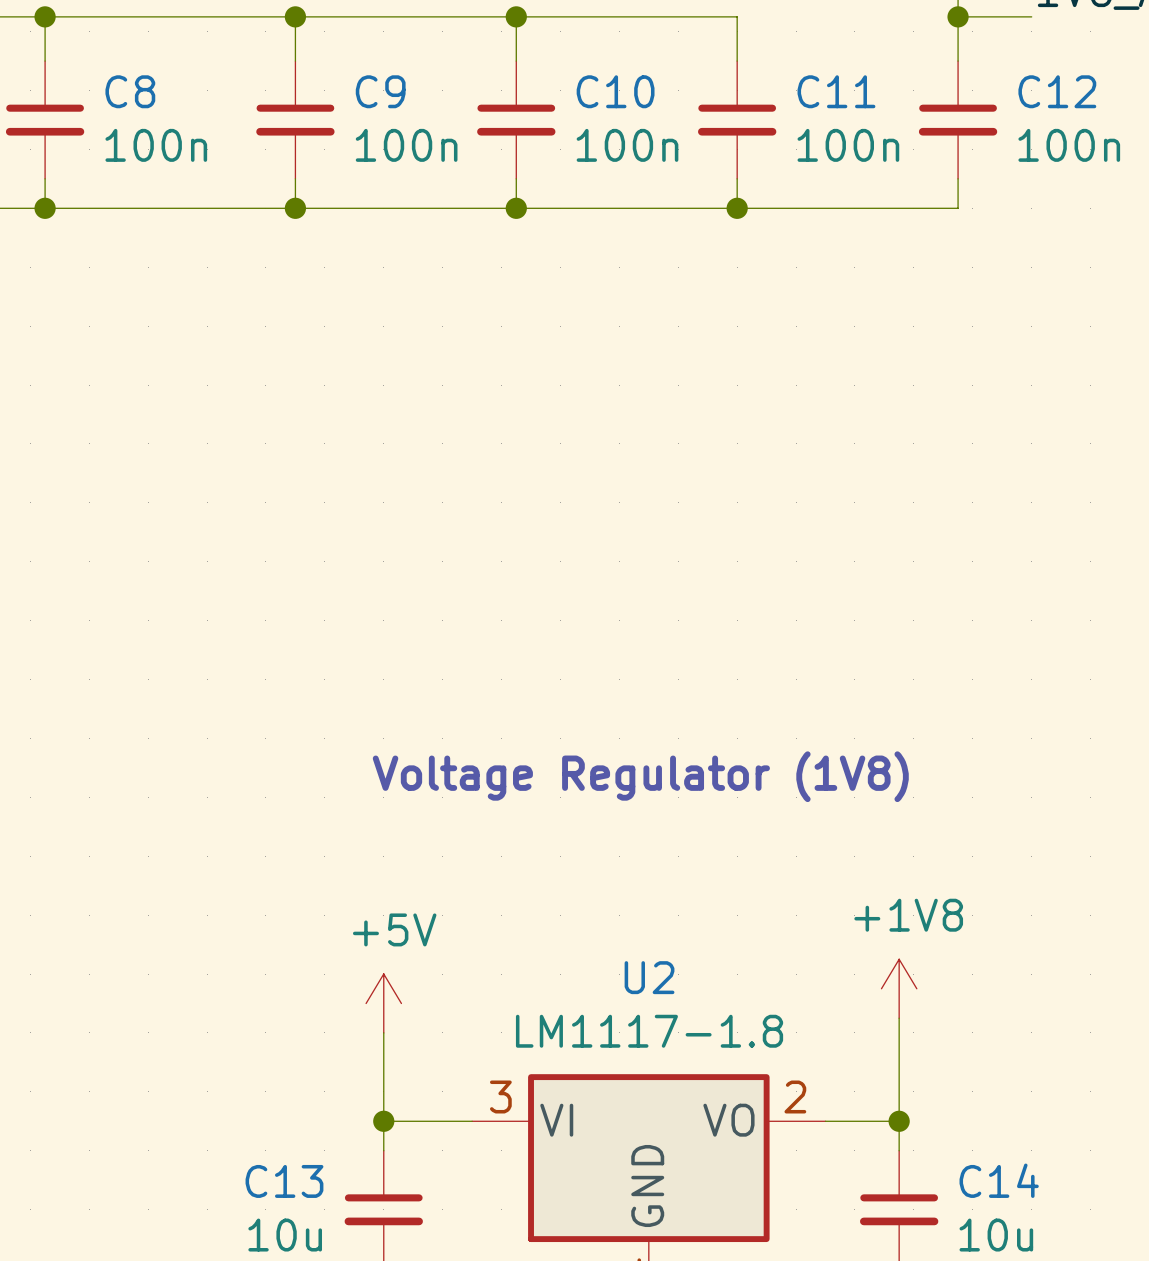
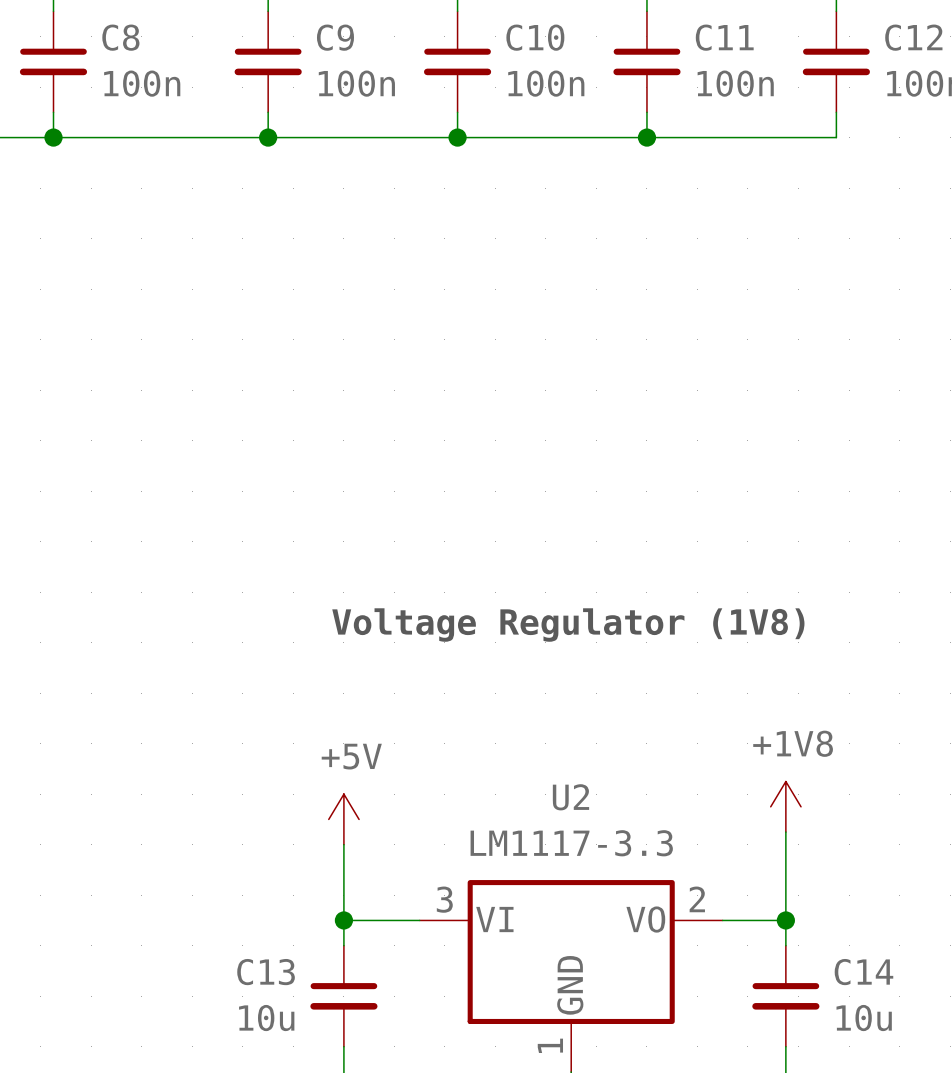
U2 value: LM1117-1.8 (649, 1031) -> LM1117-3.3 (571, 843)

